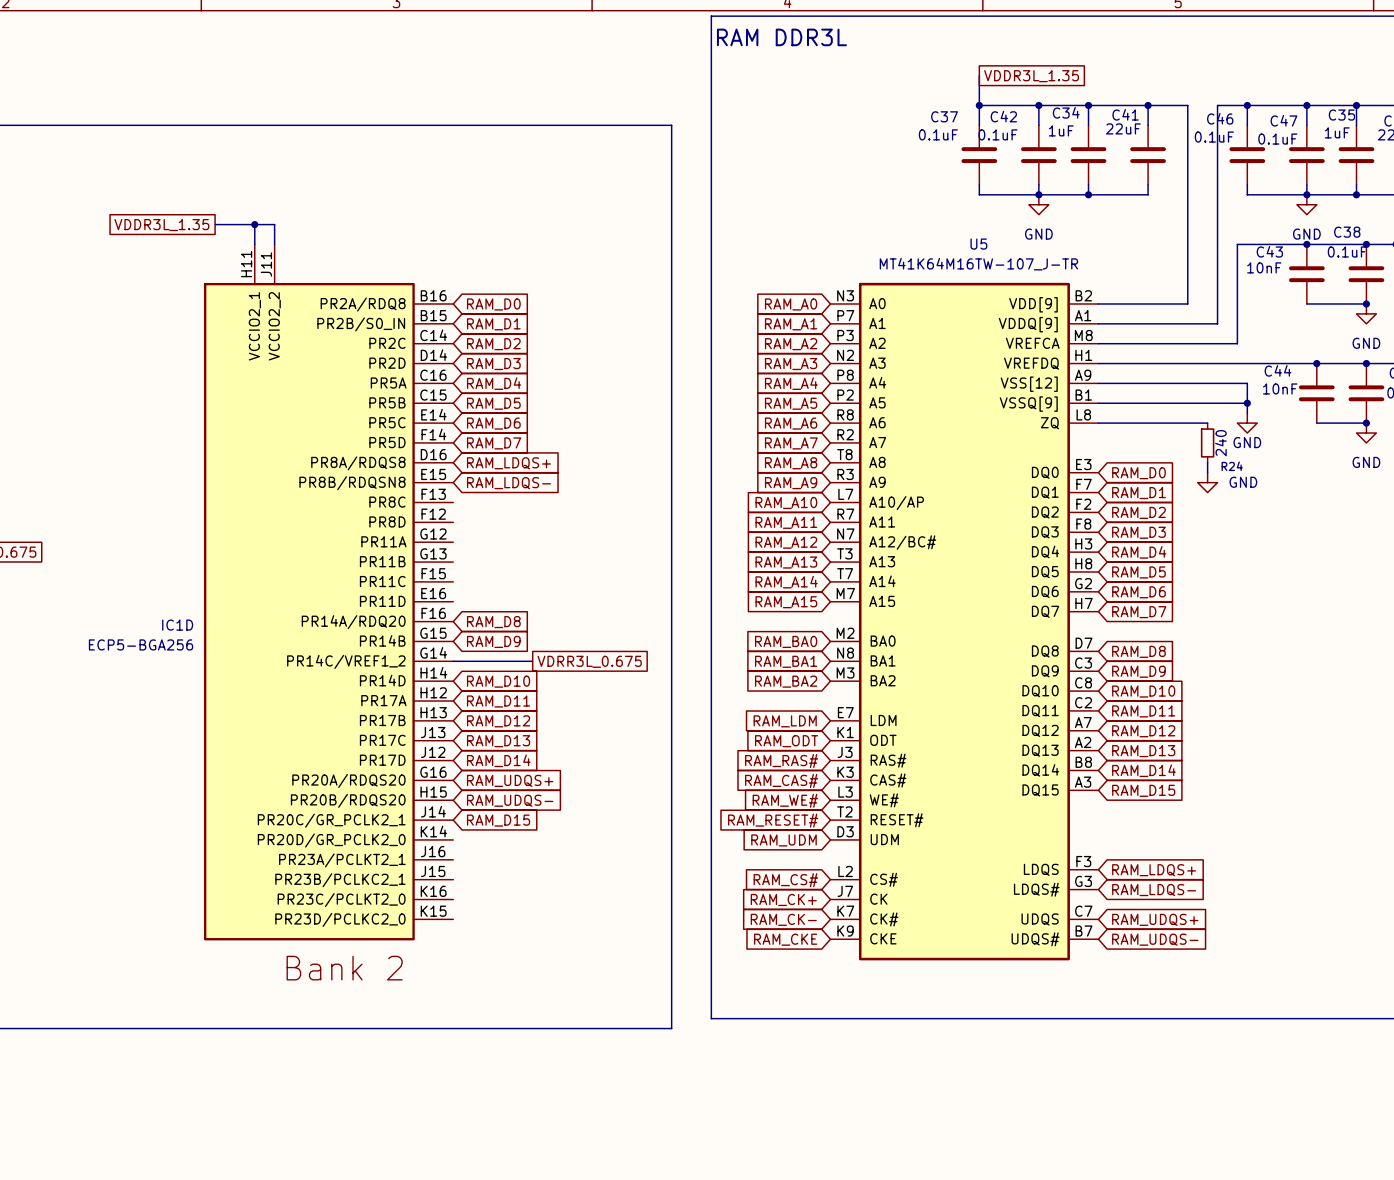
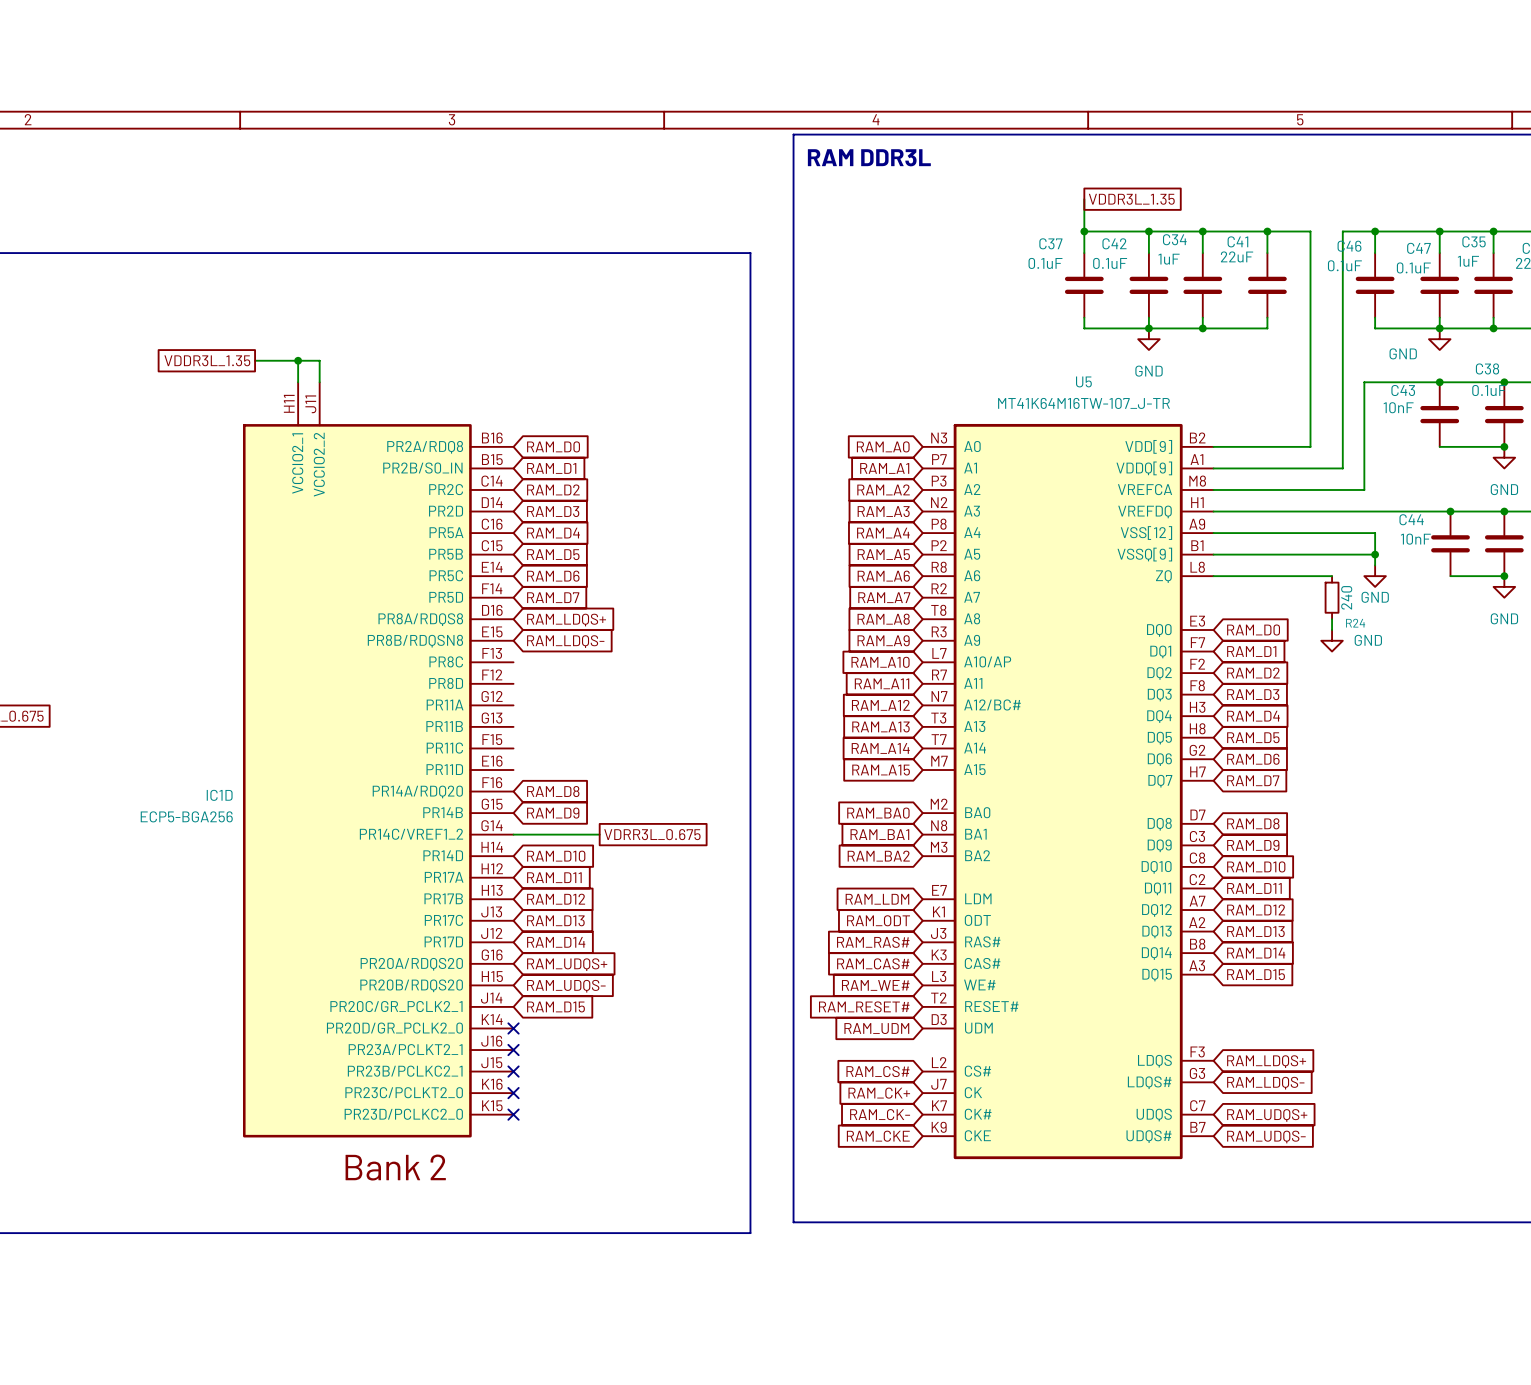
power symbol text position: GND (1306, 234) -> GND (1403, 353)
no-connect mark: none -> (513, 1028)
no-connect mark: none -> (513, 1050)
no-connect mark: none -> (513, 1071)
no-connect mark: none -> (513, 1093)
no-connect mark: none -> (513, 1114)

